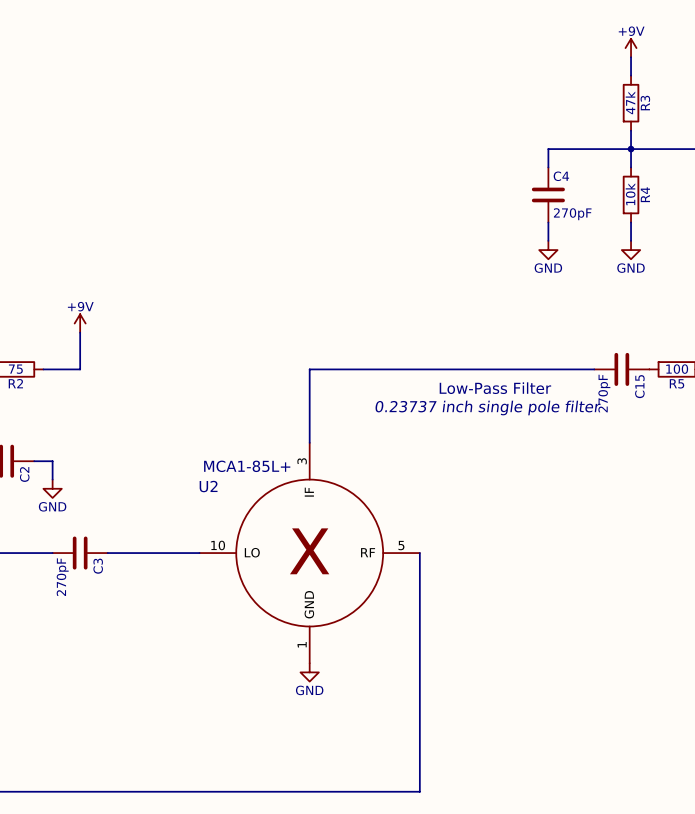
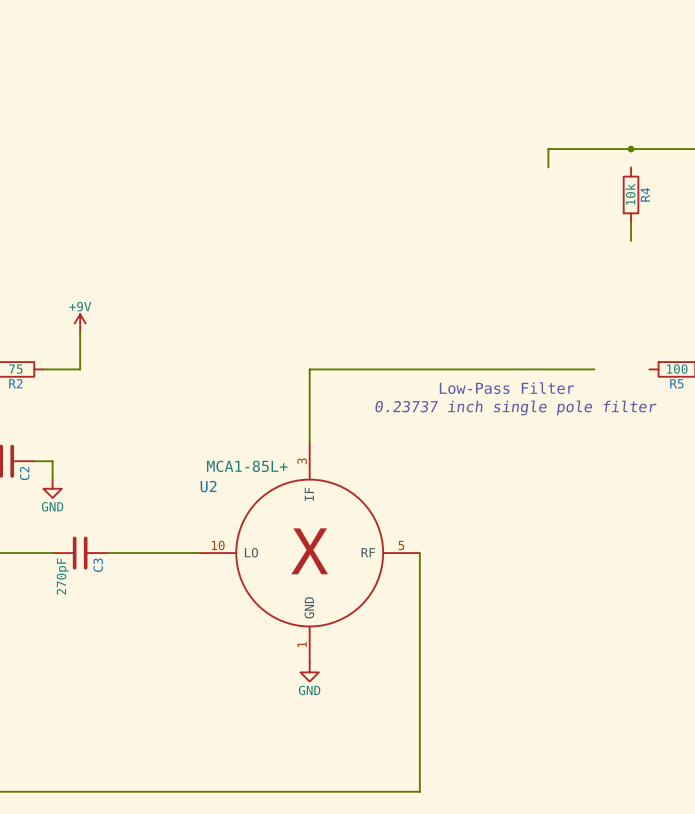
power symbol: +9V (631, 48) -> none
wire: (631, 57) (631, 75) -> none
R3: 47k (631, 103) -> none
wire: (631, 130) (631, 167) -> none
C4: 270pF (548, 194) -> none
wire: (548, 222) (548, 240) -> none
power symbol: GND (548, 250) -> none
power symbol: GND (631, 250) -> none
C15: 270pF (621, 369) -> none

